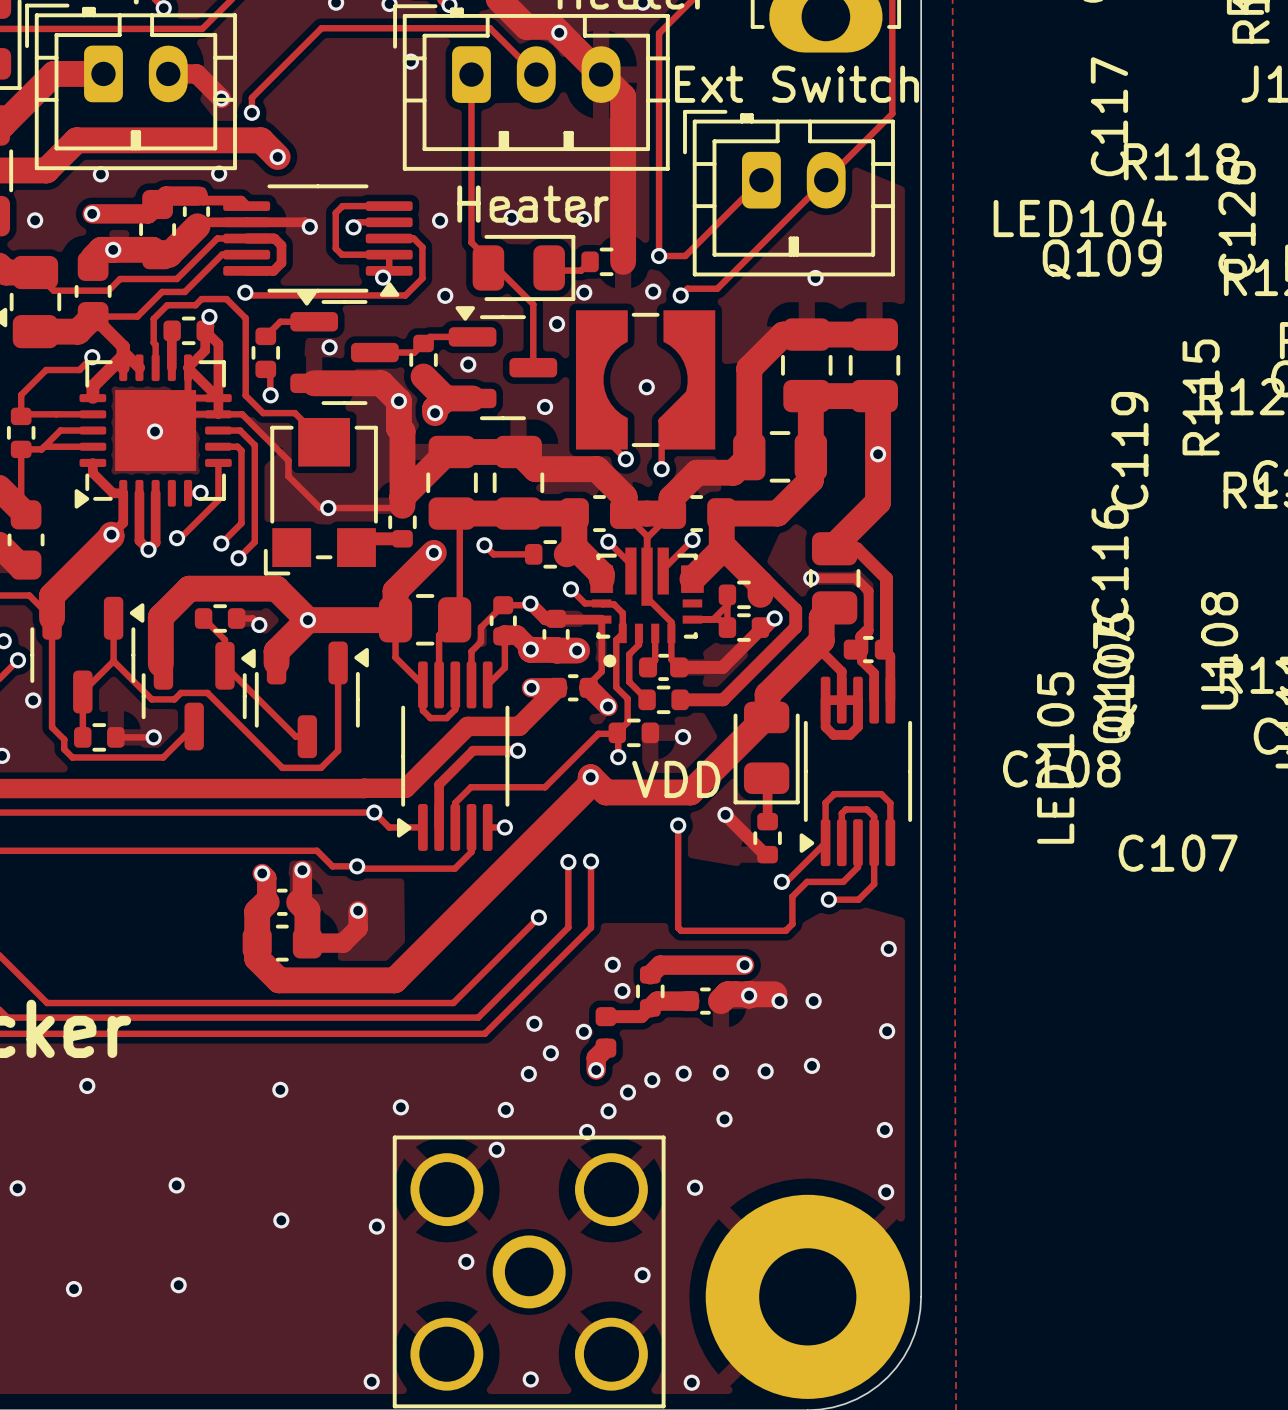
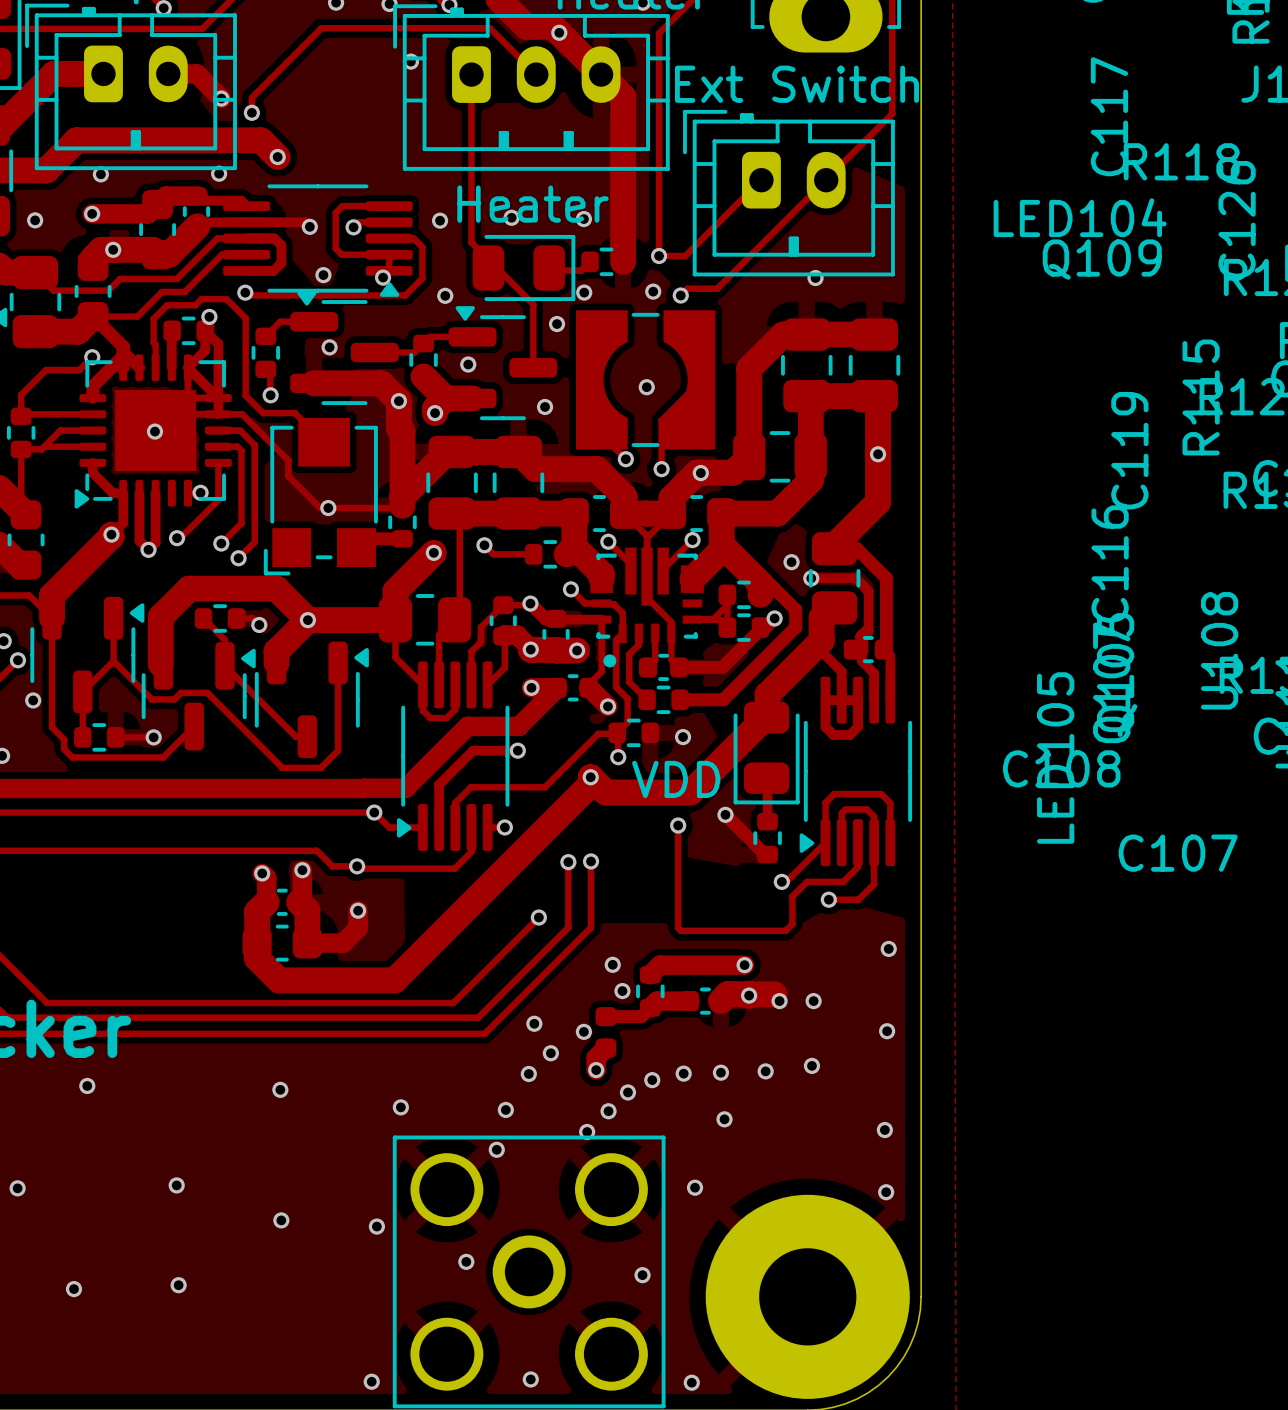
via: none -> (323, 275)
via: none -> (700, 473)
via: none -> (791, 562)

